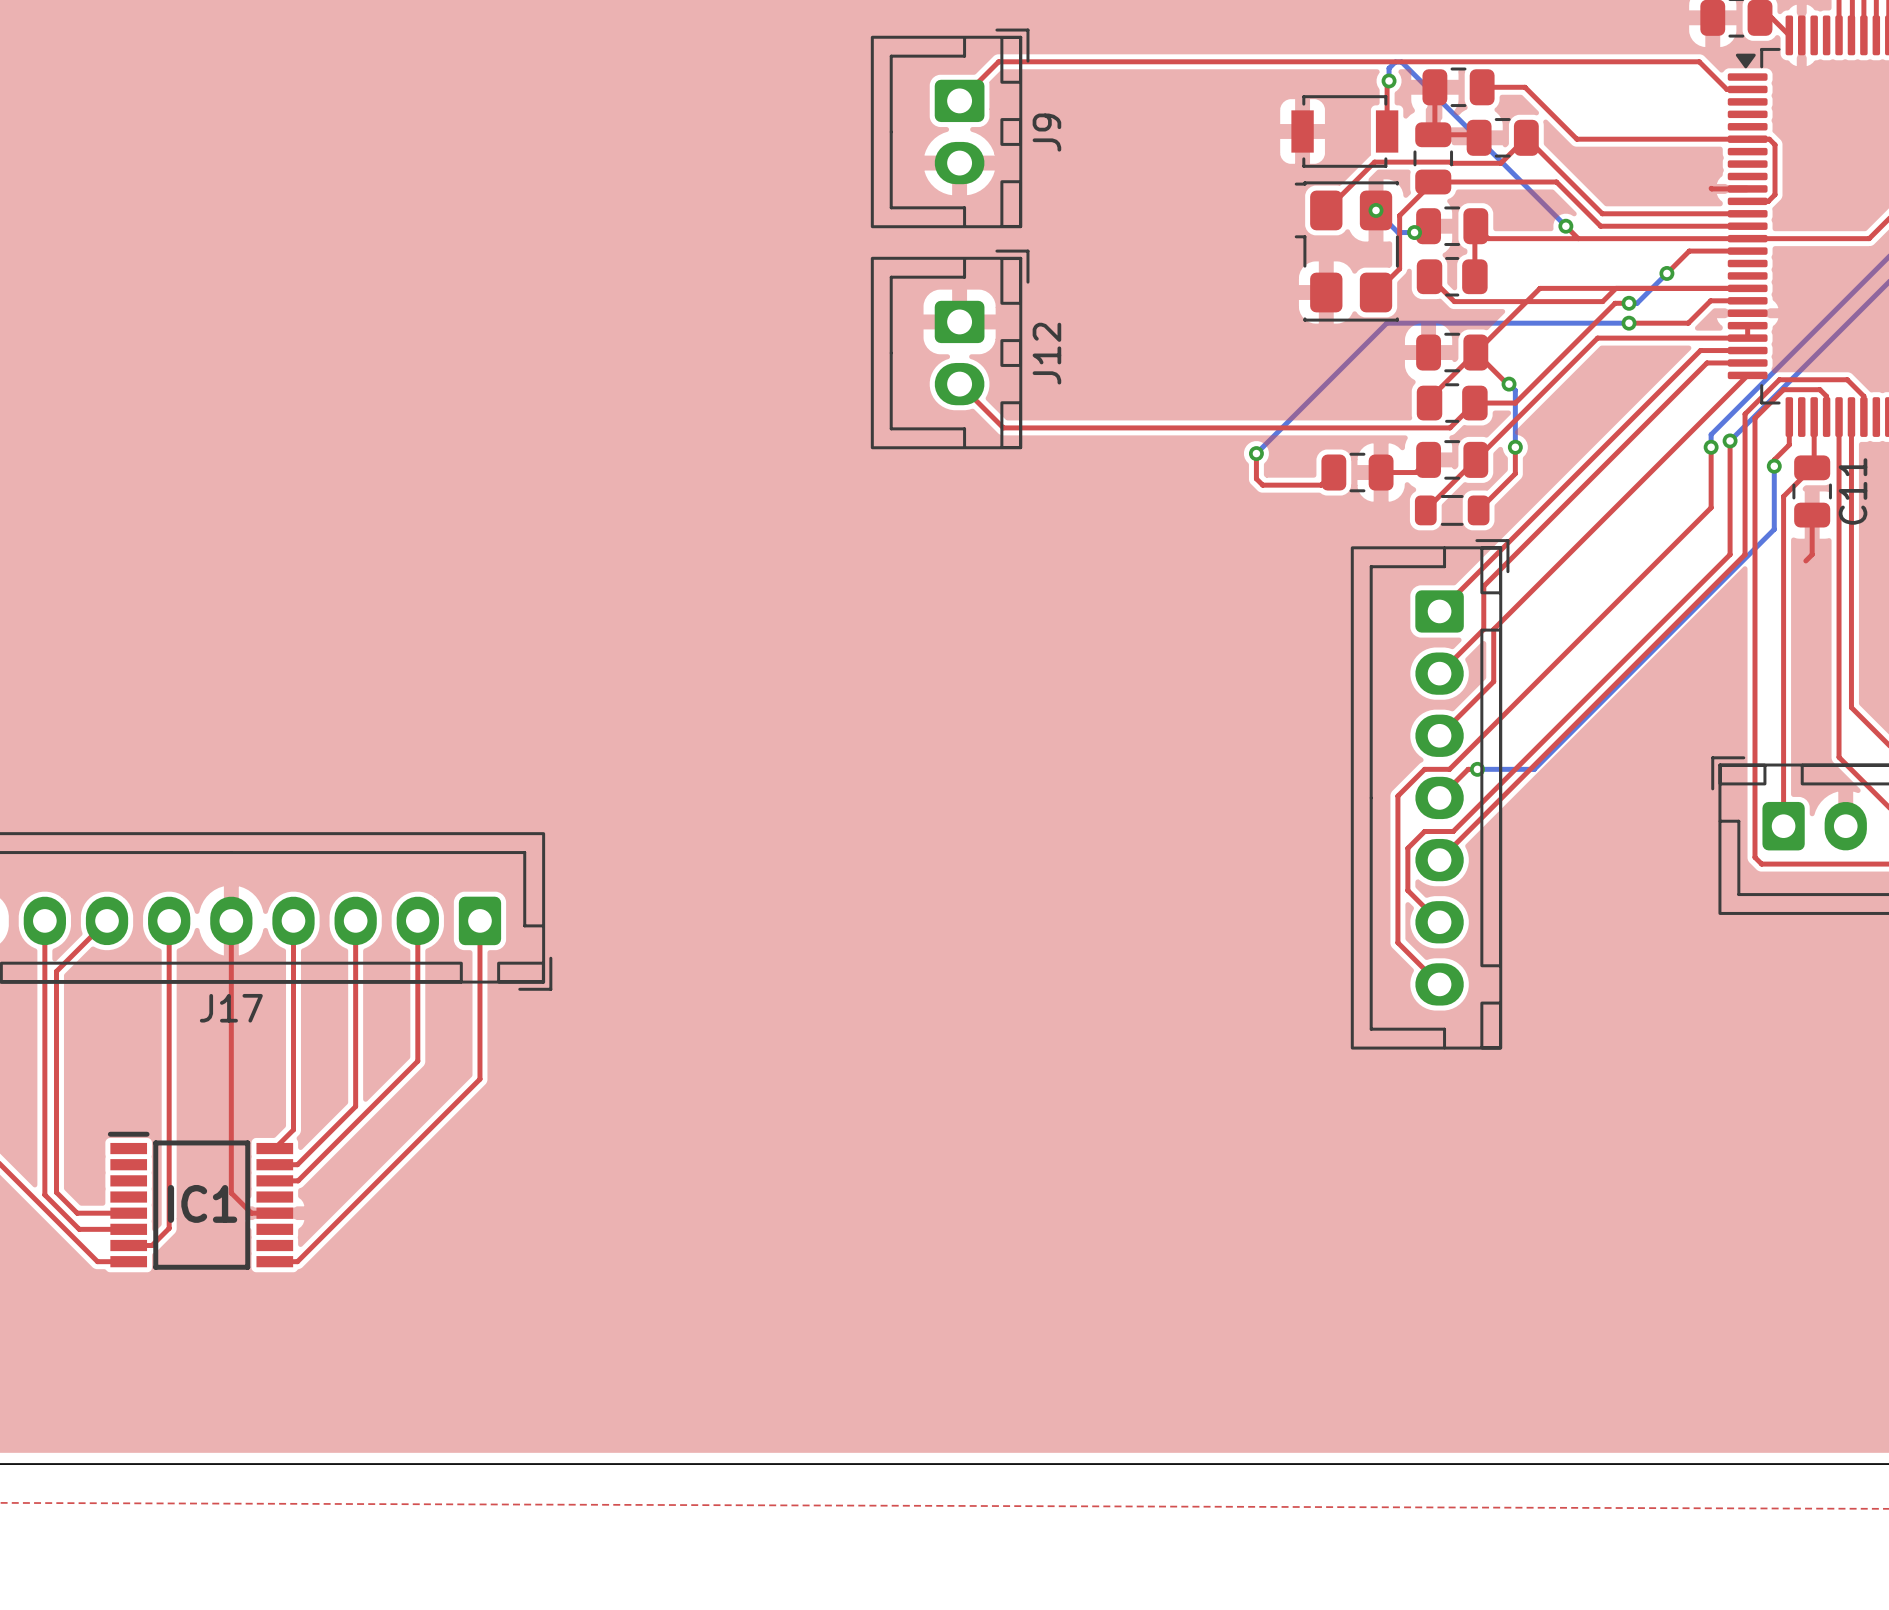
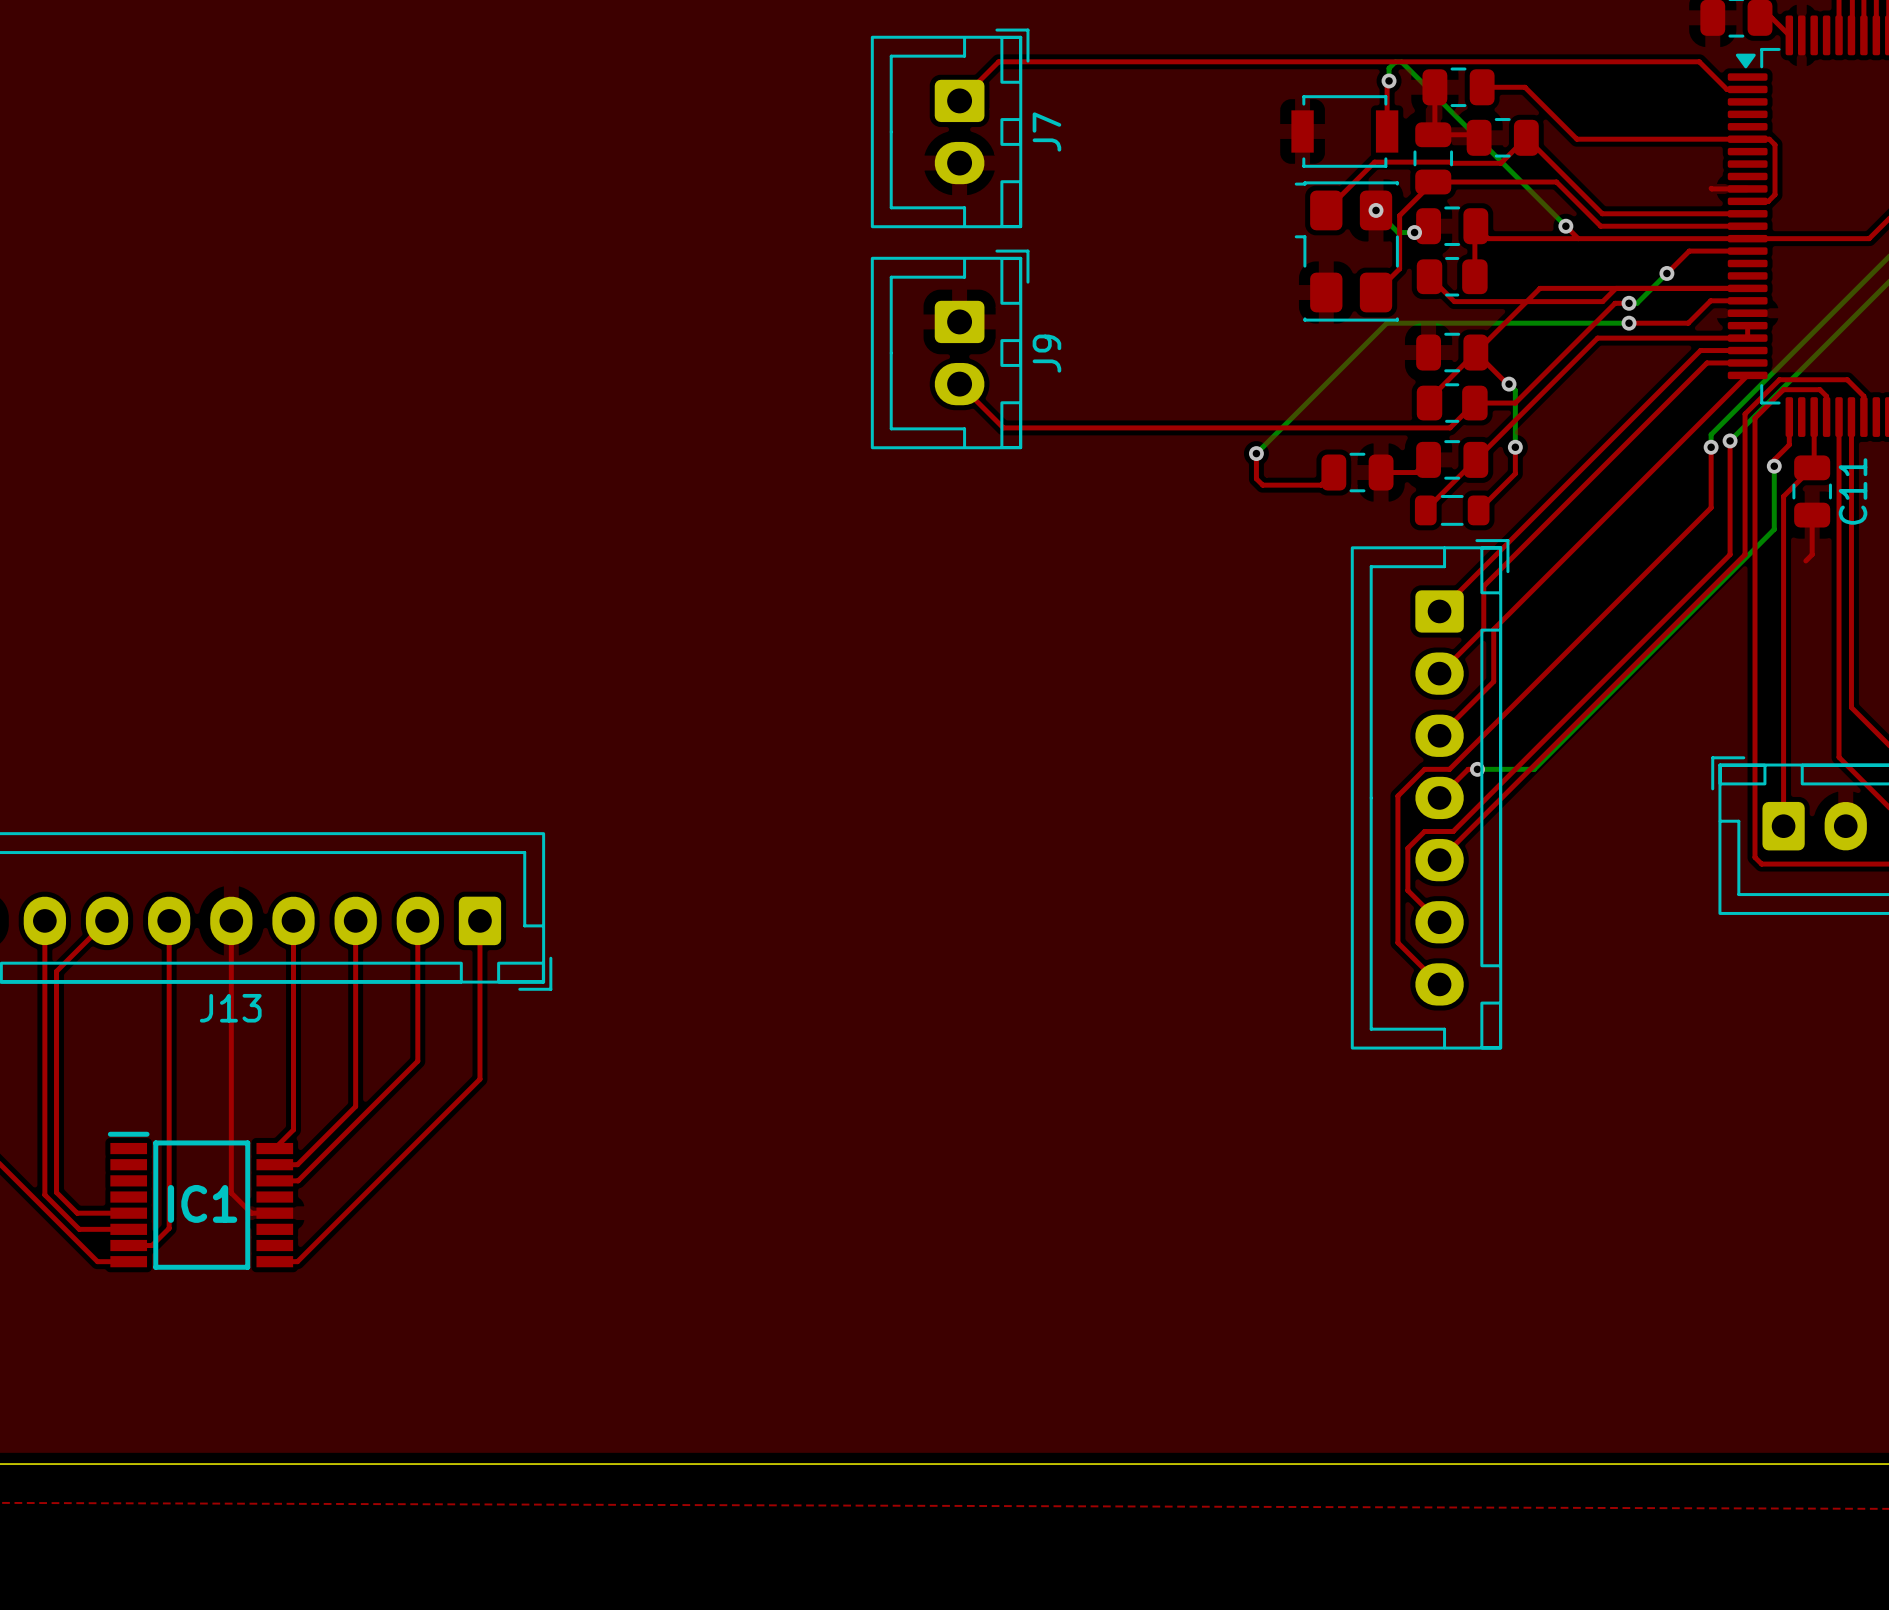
J9 name: J9 (1046, 132) -> J7 (1046, 131)
J12 name: J12 (1046, 353) -> J9 (1046, 353)
J17 name: J17 (231, 1008) -> J13 (230, 1008)

